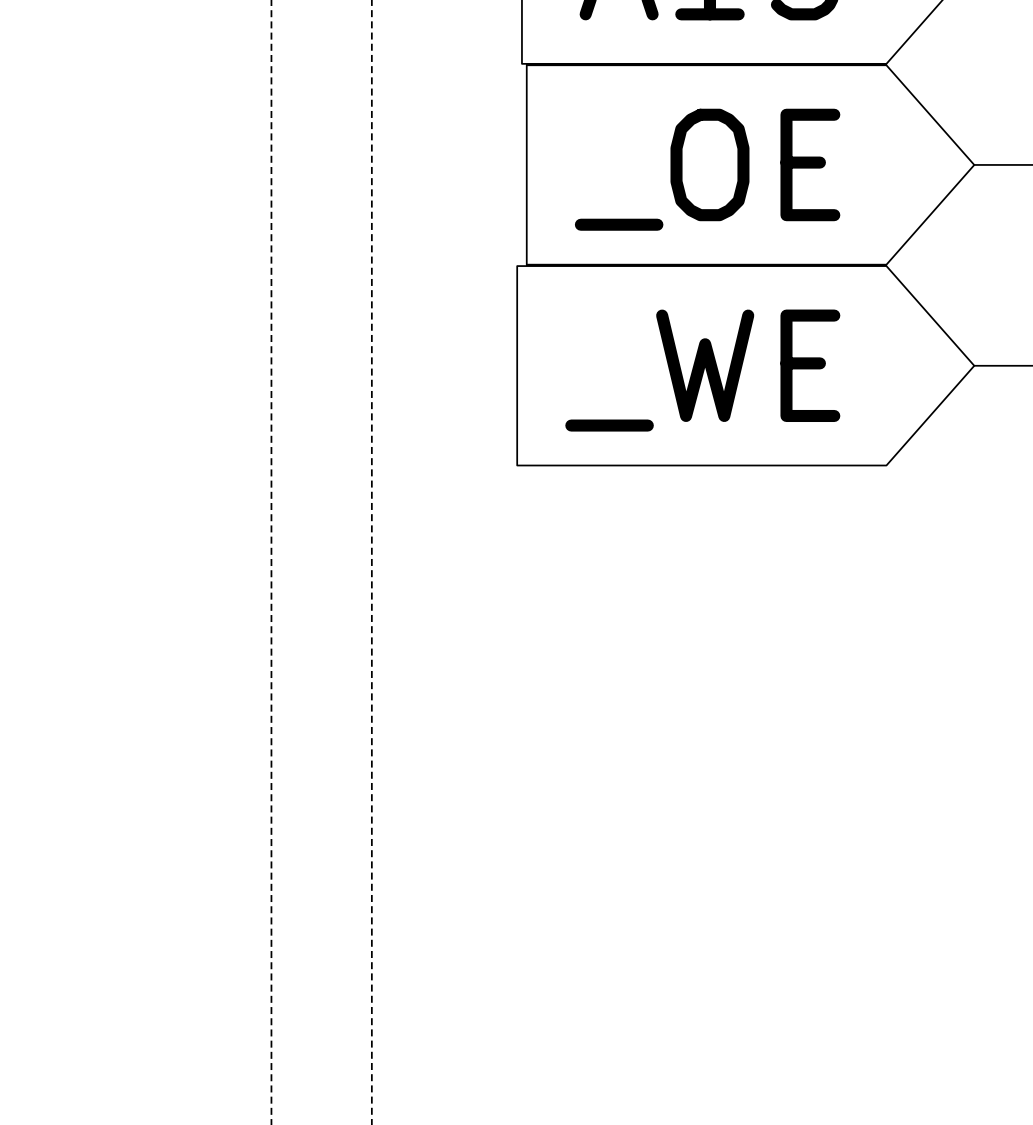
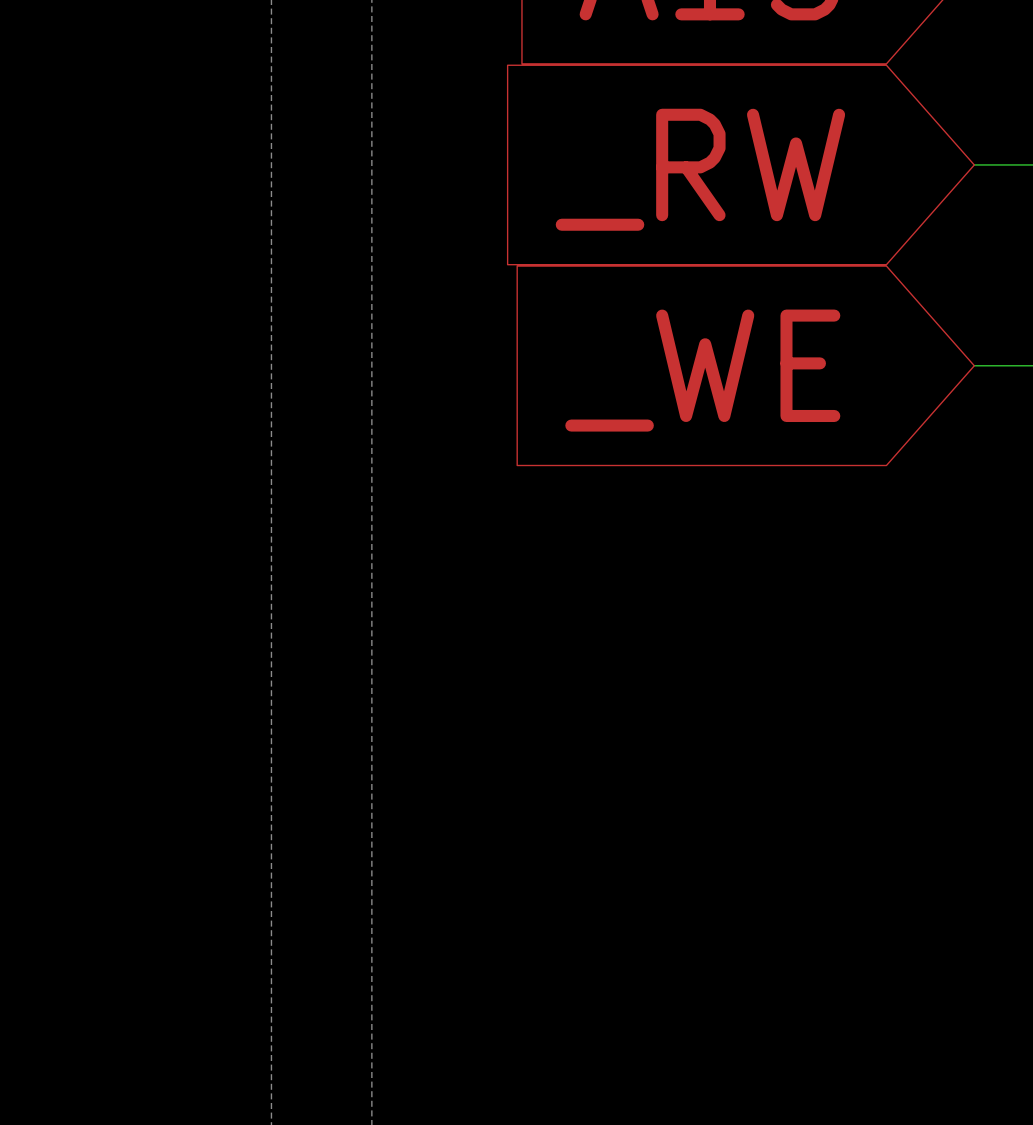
global label: _OE (707, 169) -> _RW (700, 169)

